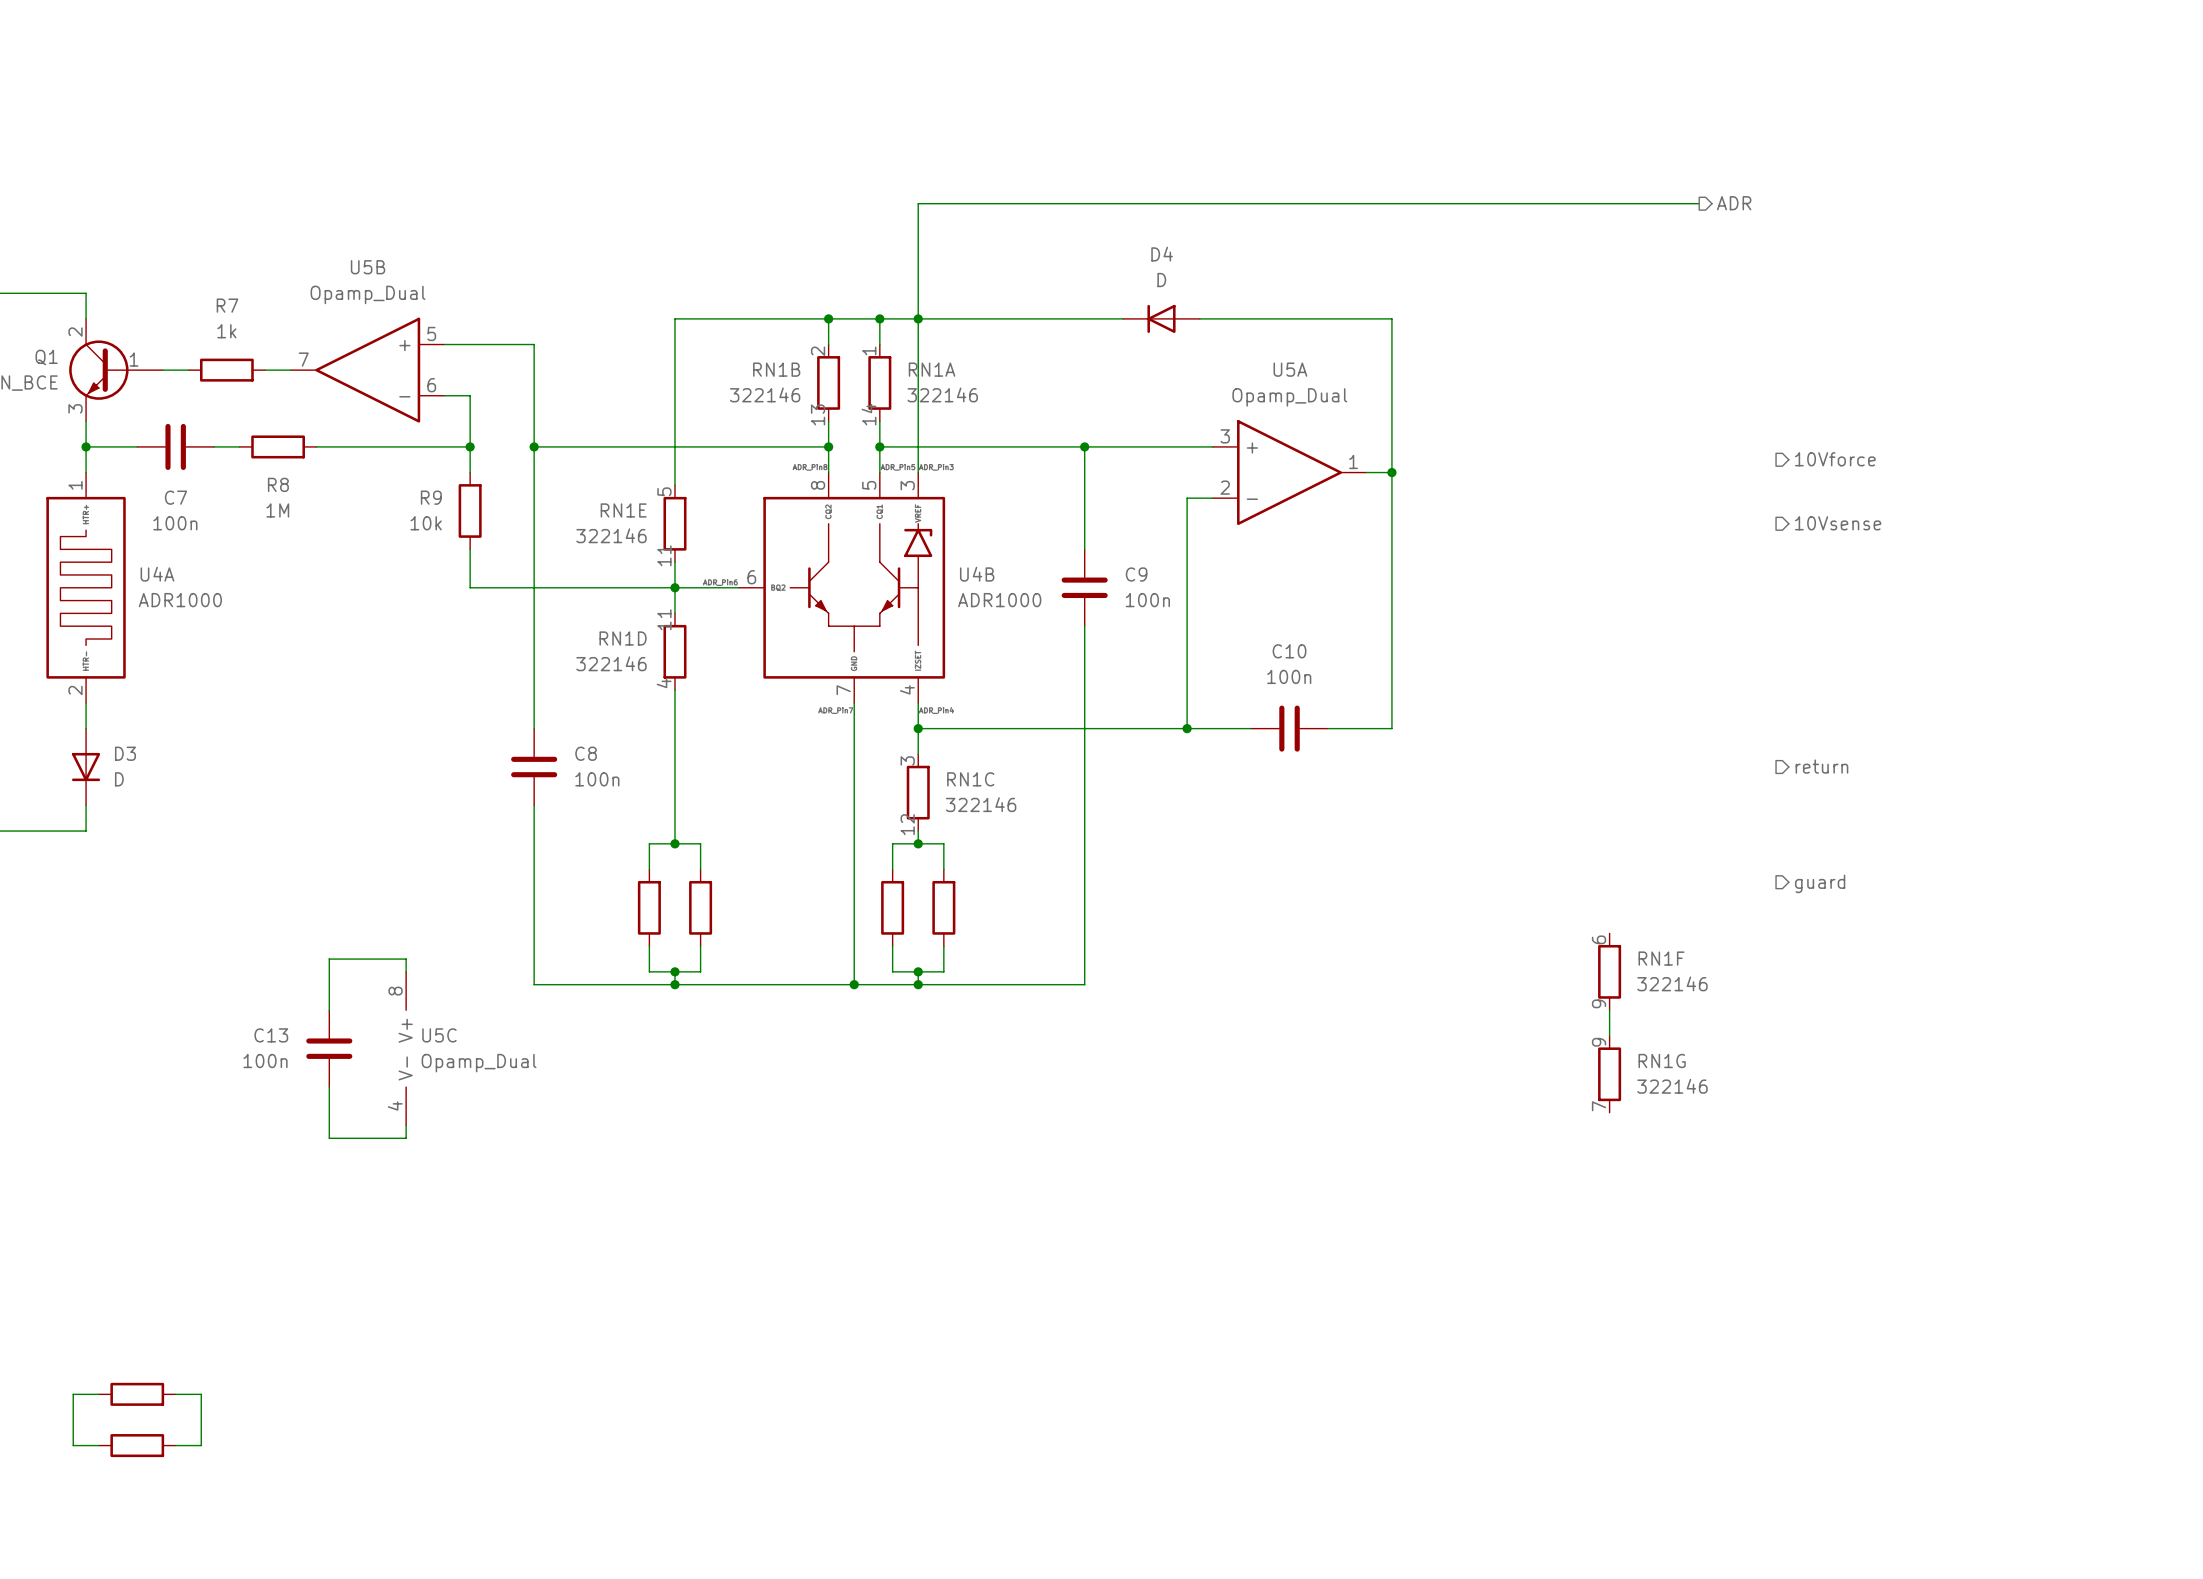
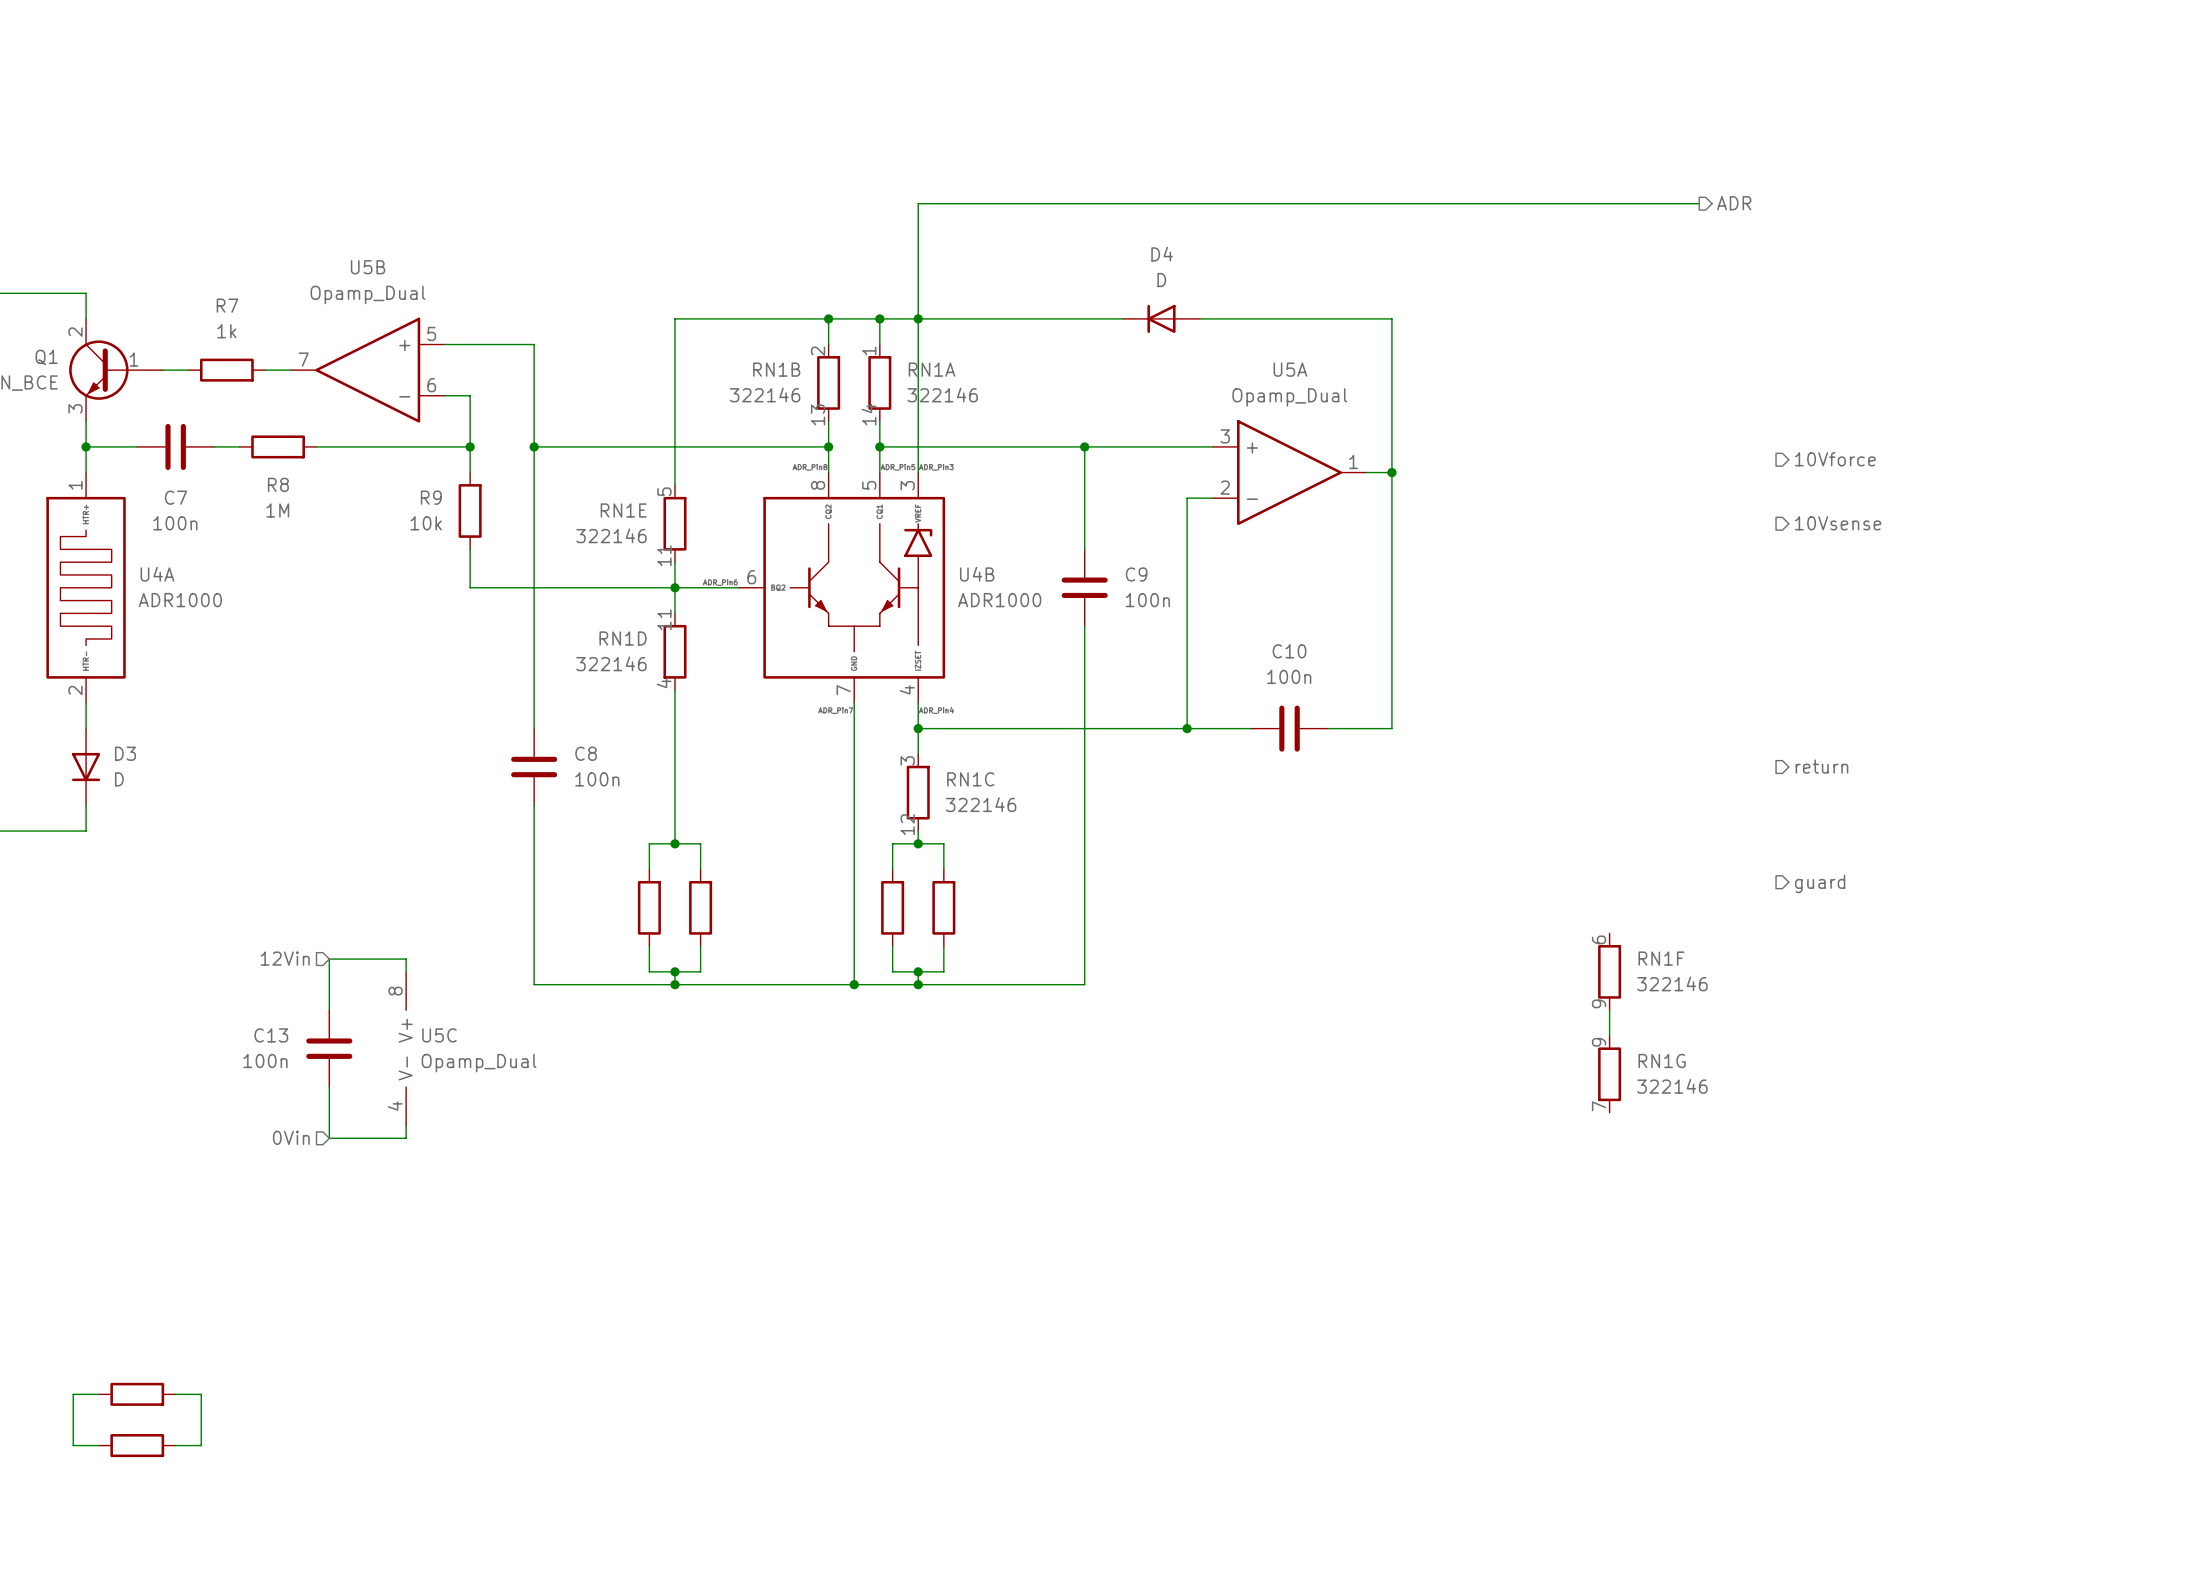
hierarchical label: none -> 12Vin (285, 958)
hierarchical label: none -> 0Vin (291, 1137)

